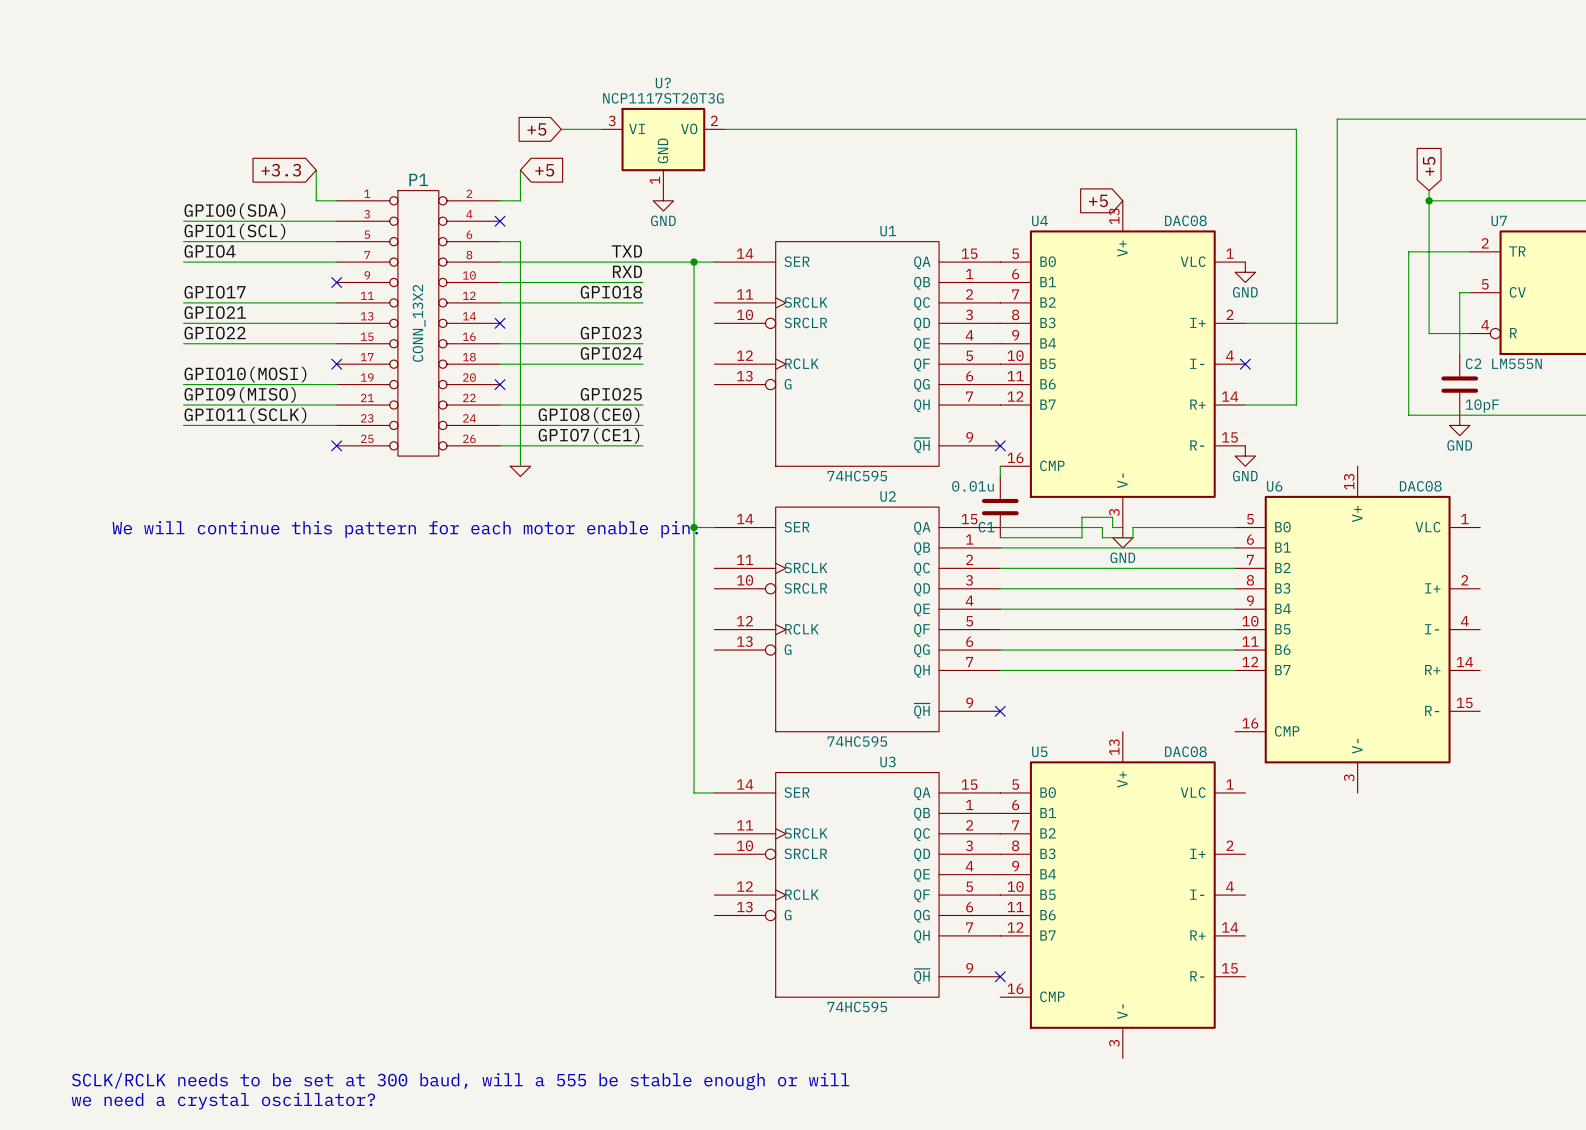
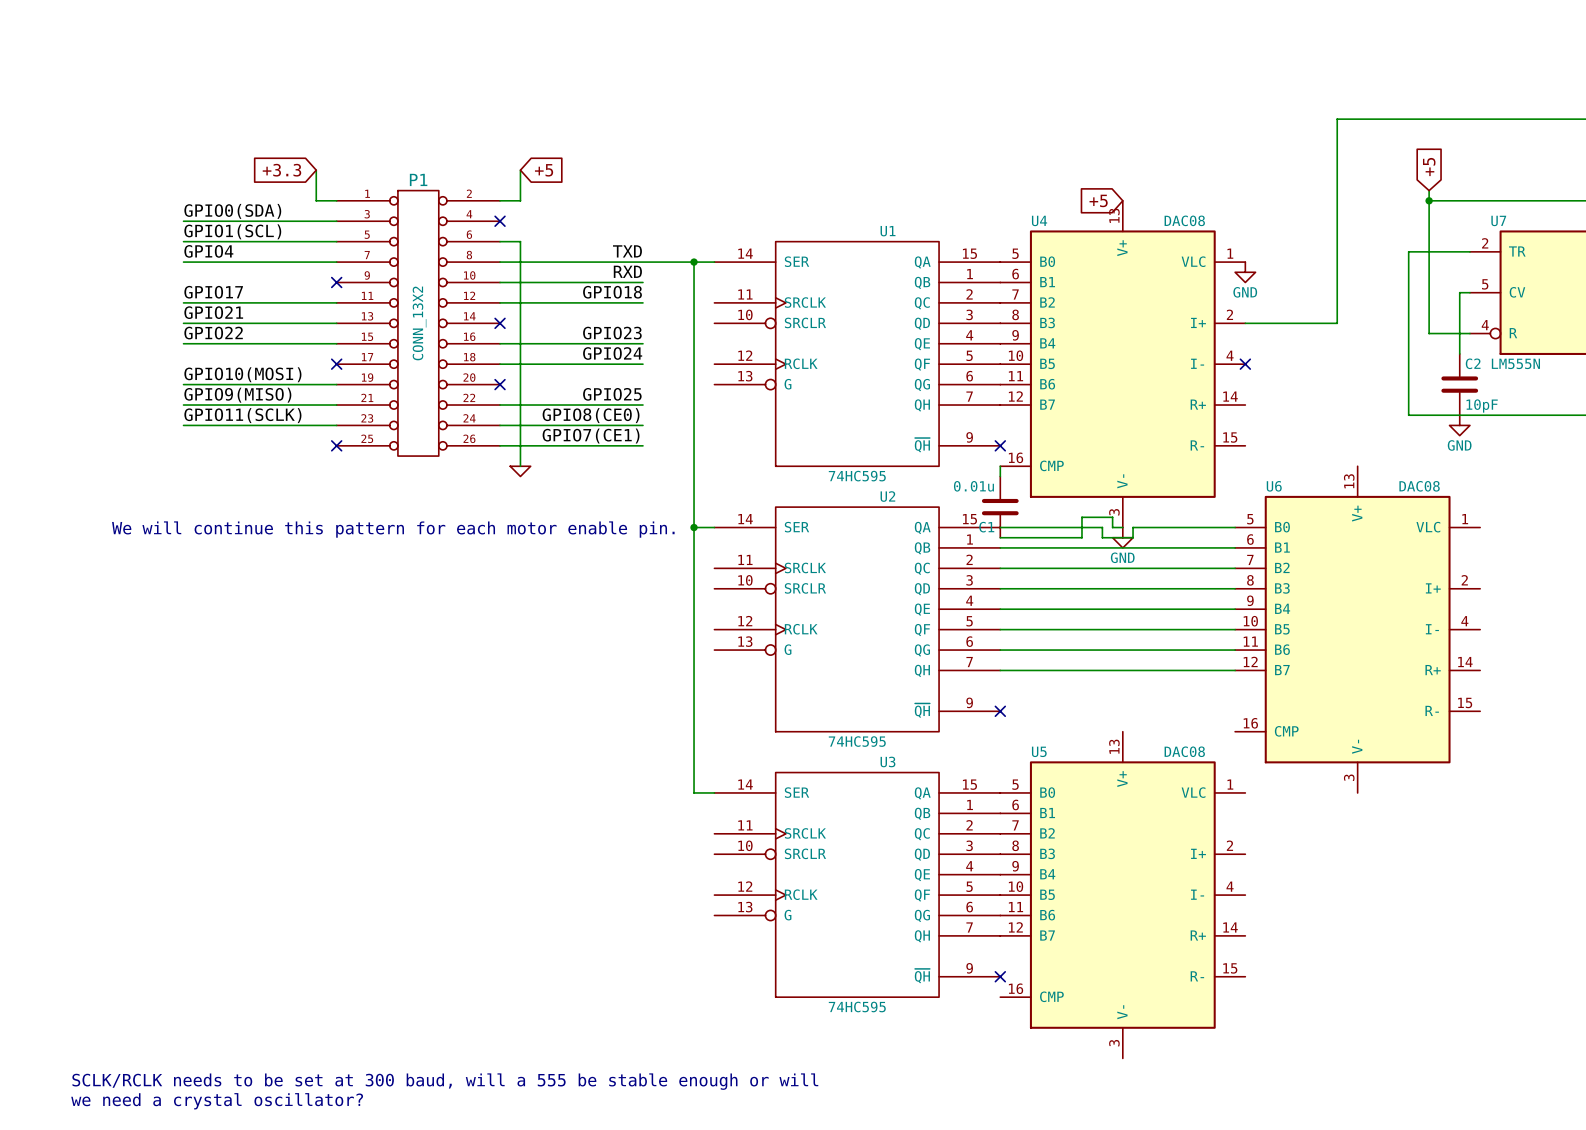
global label: +5 (536, 129) -> none
wire: (561, 129) (602, 129) -> none
wire: (724, 129) (1296, 129) (1296, 405) (1245, 405) -> none
U?: NCP1117ST20T3G (663, 149) -> none
power symbol: GND (663, 200) -> none
power symbol: GND (1245, 456) -> none

